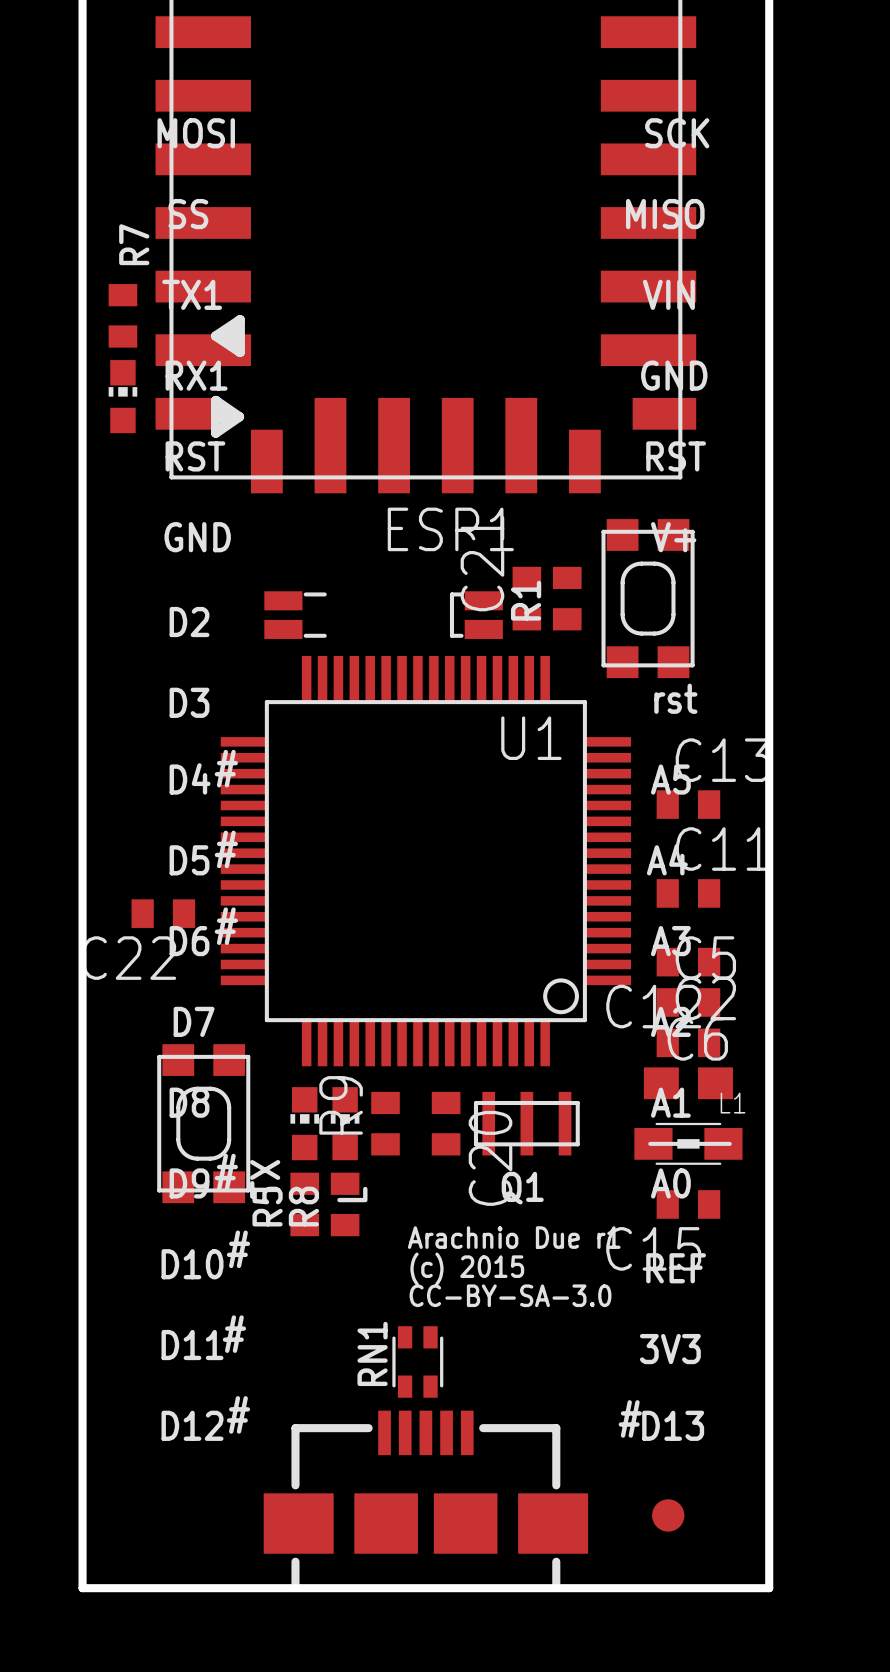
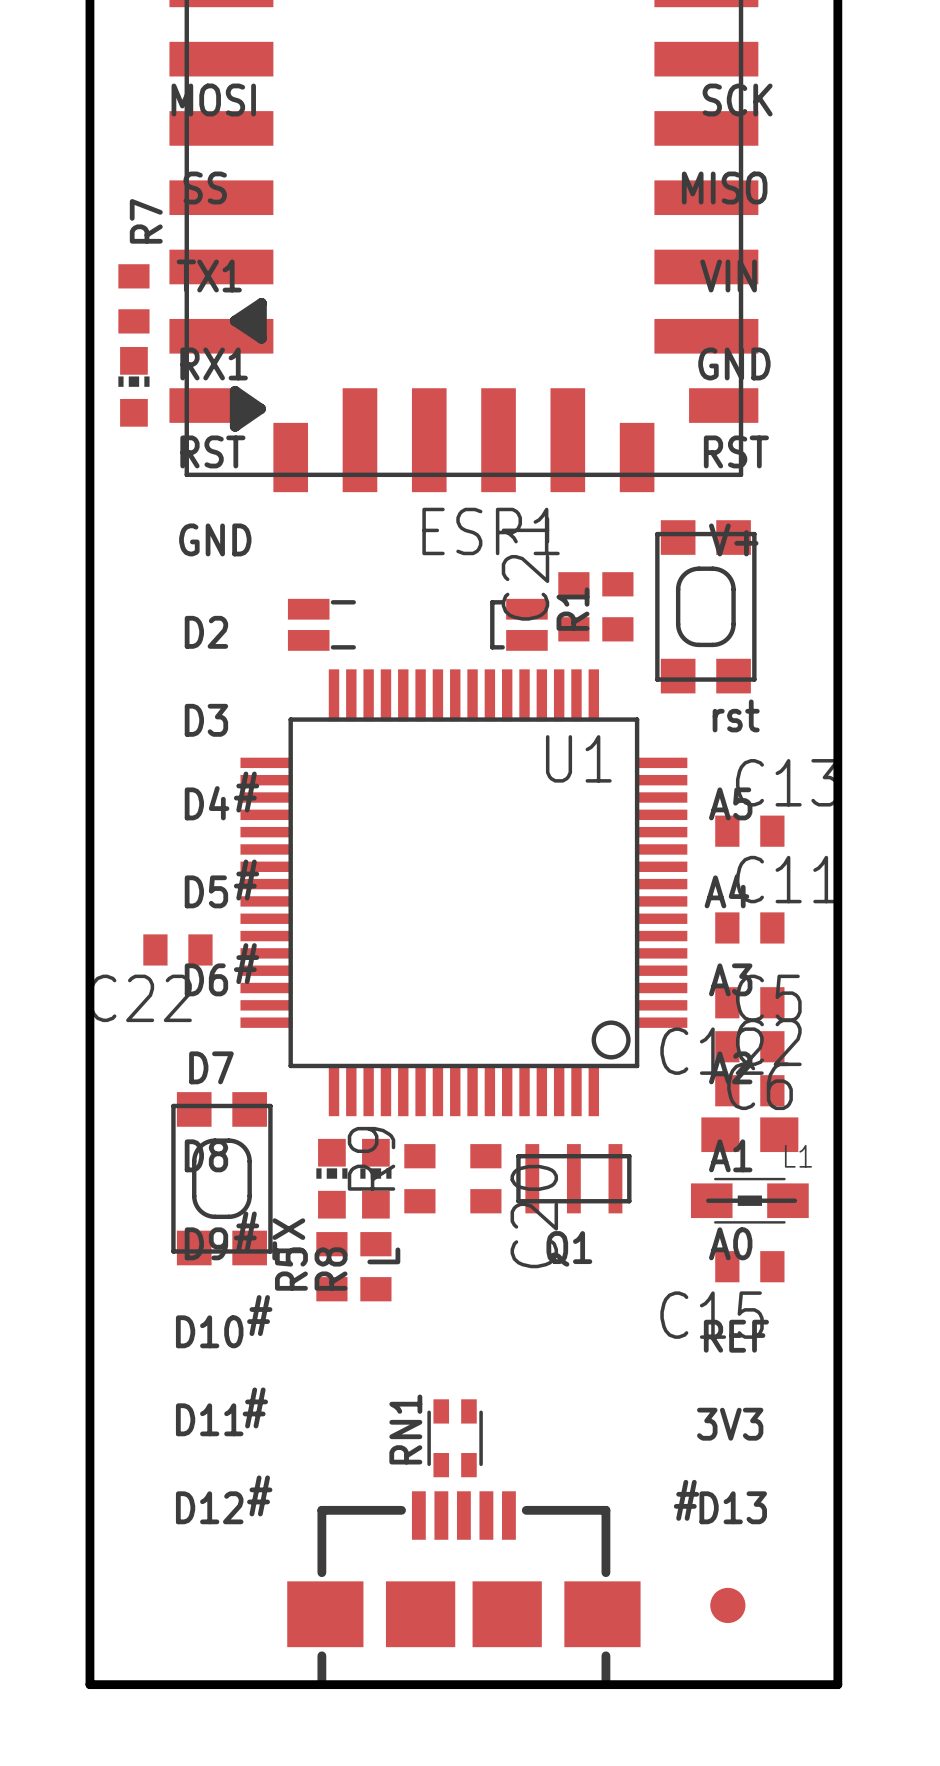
text: Arachnio Due r1 (514, 1237) -> none
text: (c) 2015 (467, 1268) -> none
text: CC-BY-SA-3.0 (510, 1295) -> none

